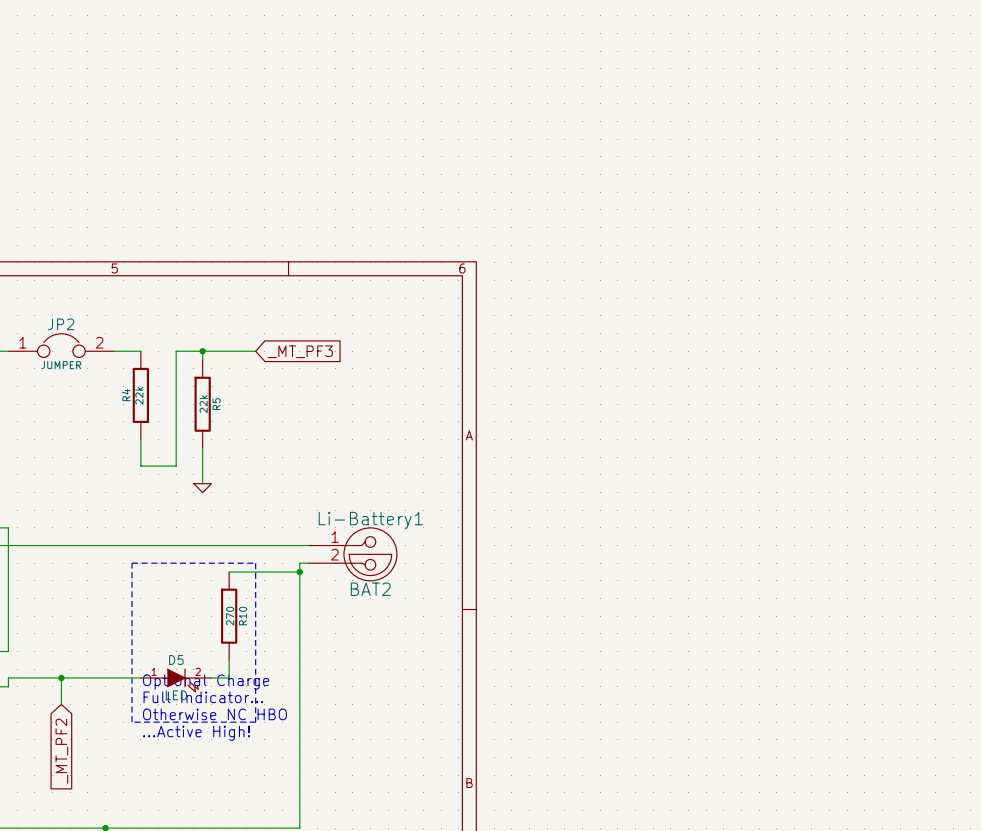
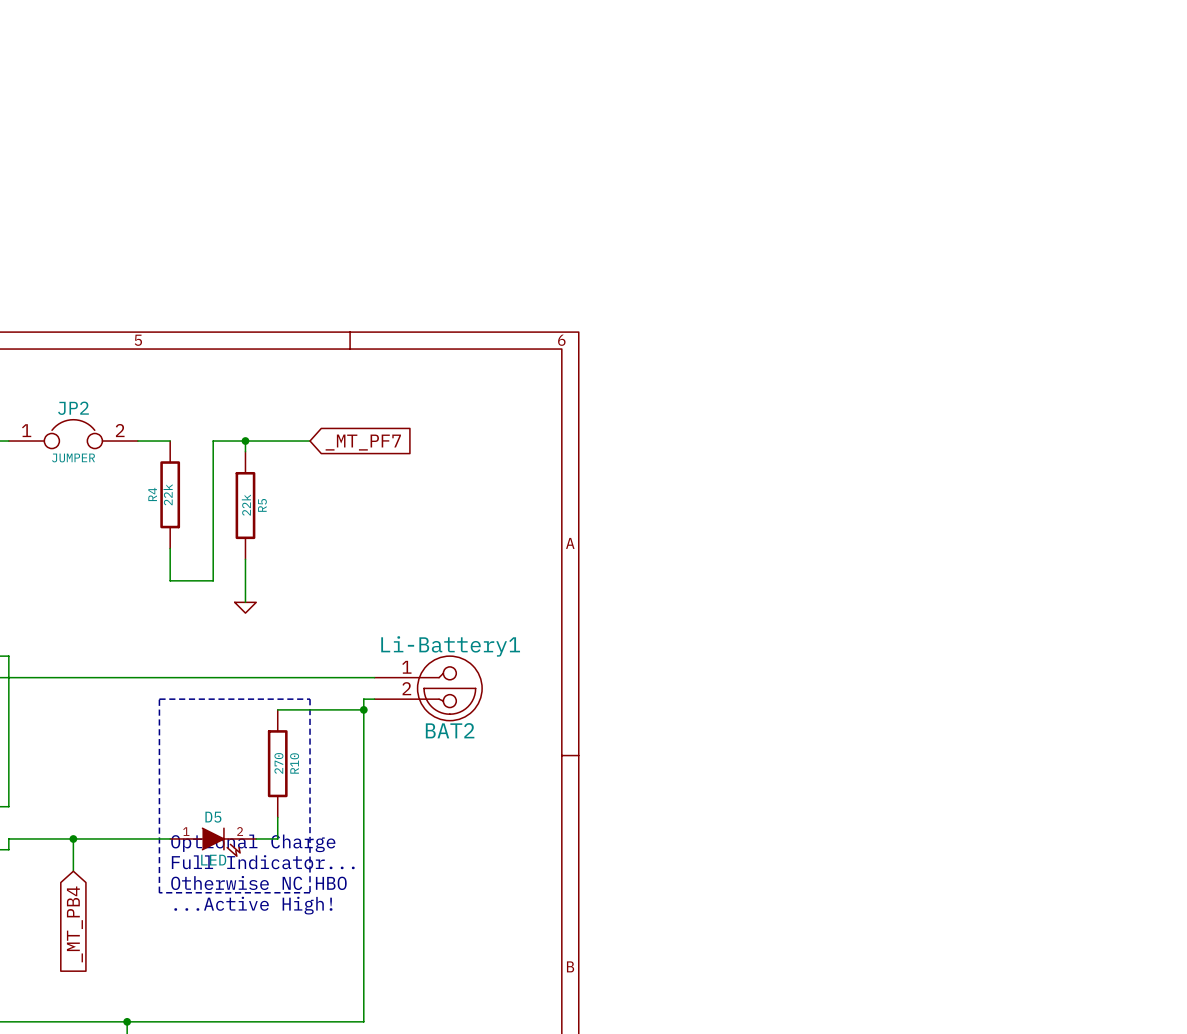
global label: _MT_PF3 (300, 351) -> _MT_PF7 (363, 442)
global label: _MT_PF2 (61, 751) -> _MT_PB4 (74, 924)

